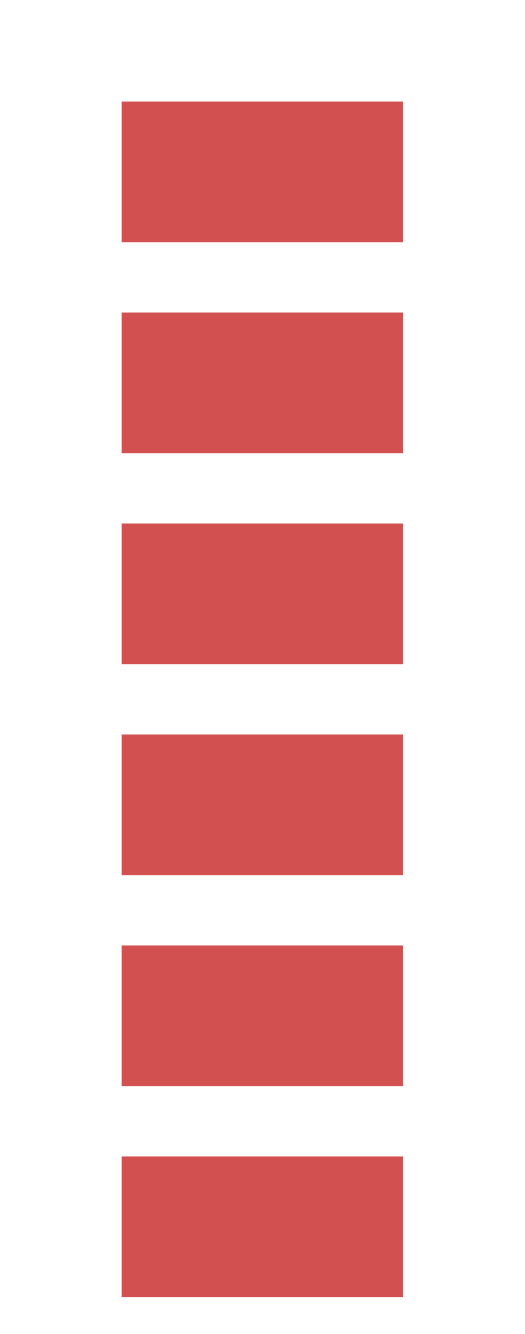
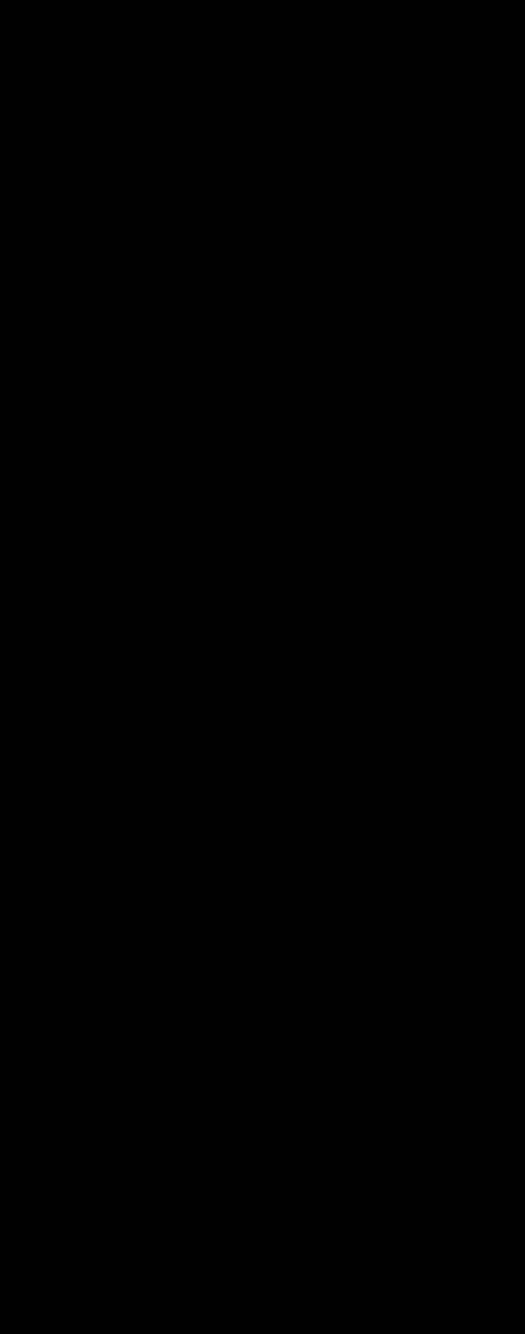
part: (262, 171) -> none
part: (262, 382) -> none
part: (262, 593) -> none
part: (262, 804) -> none
part: (262, 1015) -> none
part: (262, 1226) -> none

